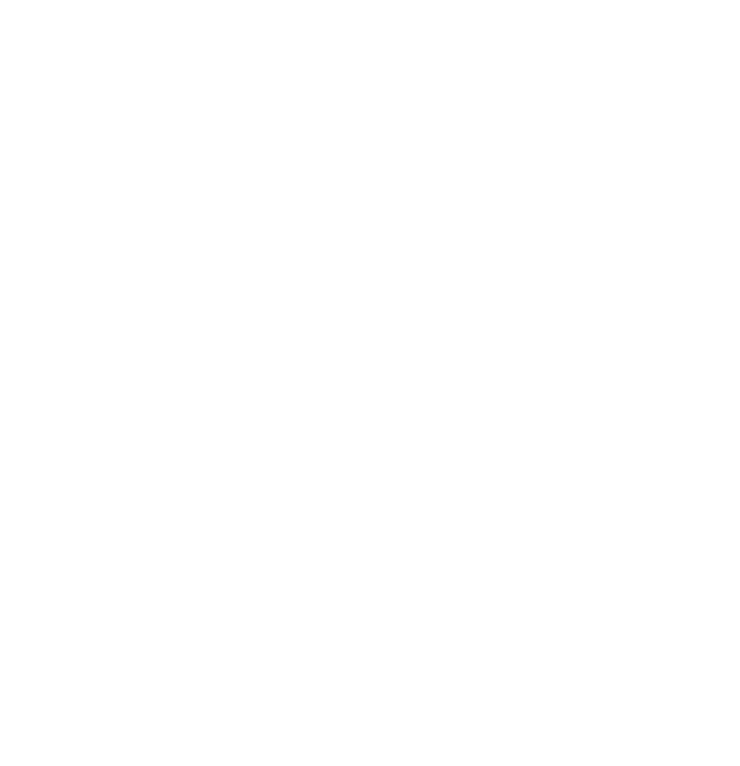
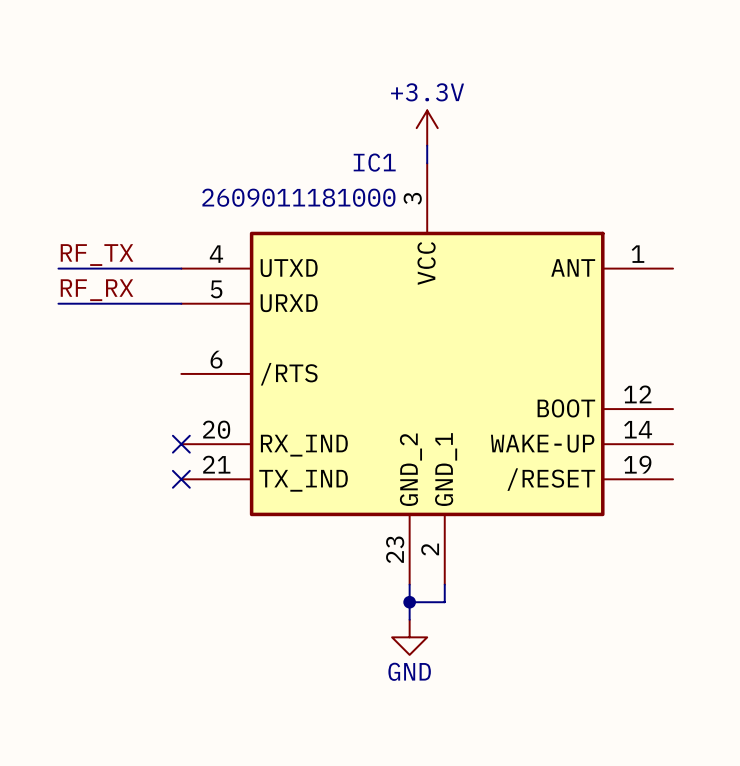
power symbol: none -> +3.3V (427, 128)
wire: none -> (427, 145) (427, 163)
label: none -> RF_TX (97, 255)
wire: none -> (58, 268) (181, 268)
label: none -> RF_RX (97, 290)
wire: none -> (58, 303) (181, 303)
IC1: none -> 2609011181000 (427, 373)
no-connect mark: none -> (181, 444)
no-connect mark: none -> (181, 479)
wire: none -> (409, 584) (409, 619)
wire: none -> (444, 584) (444, 602) (409, 602)
junction: none -> (409, 602)
power symbol: none -> GND (409, 637)

